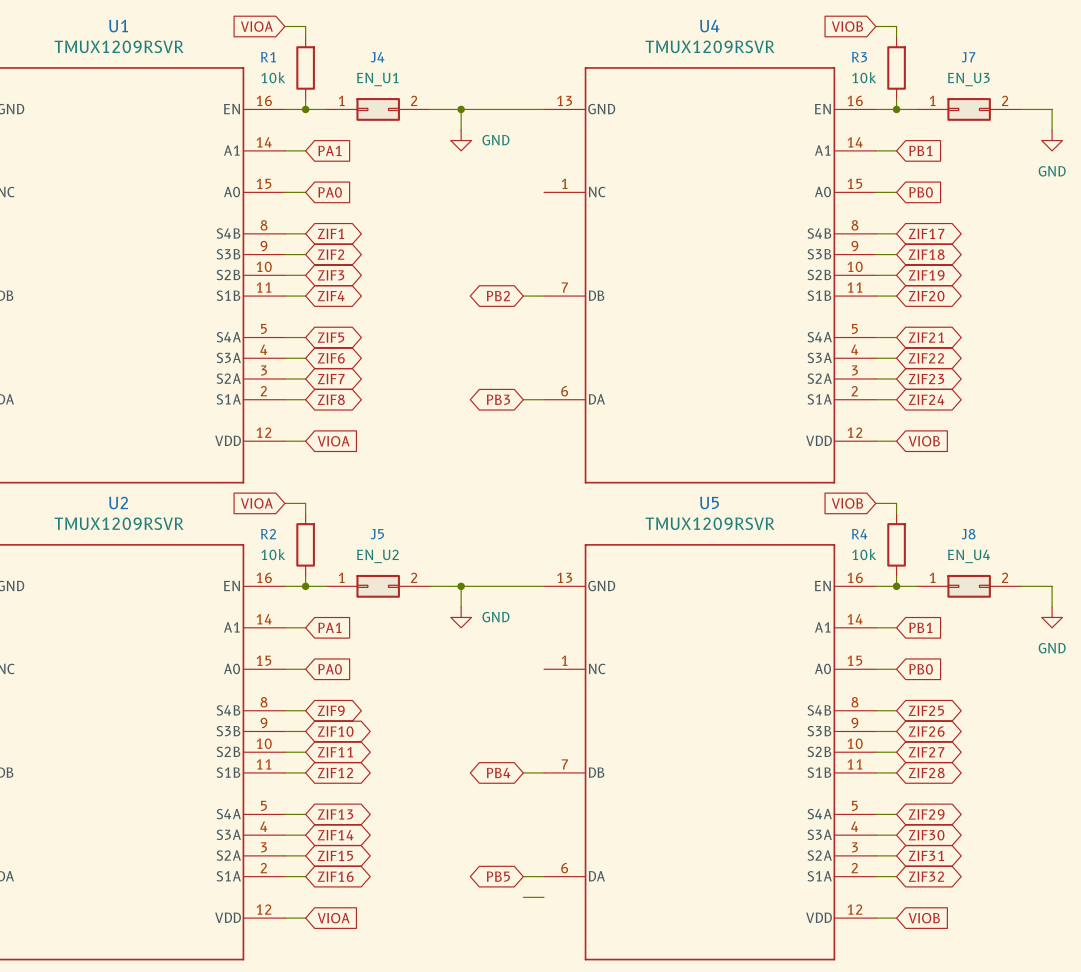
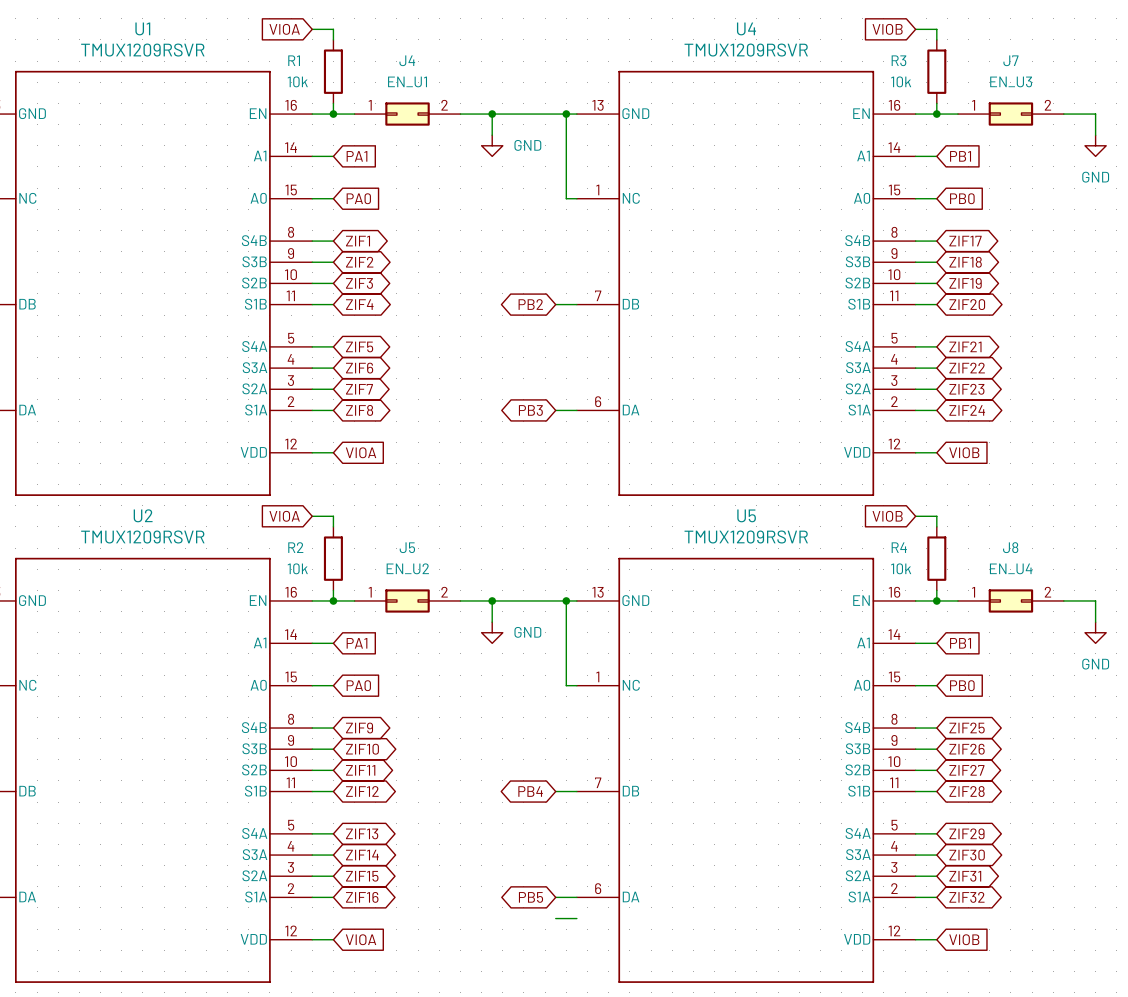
wire: none -> (566, 114) (566, 198) (576, 198)
junction: none -> (566, 114)
wire: none -> (566, 600) (566, 685) (576, 685)
junction: none -> (566, 600)

